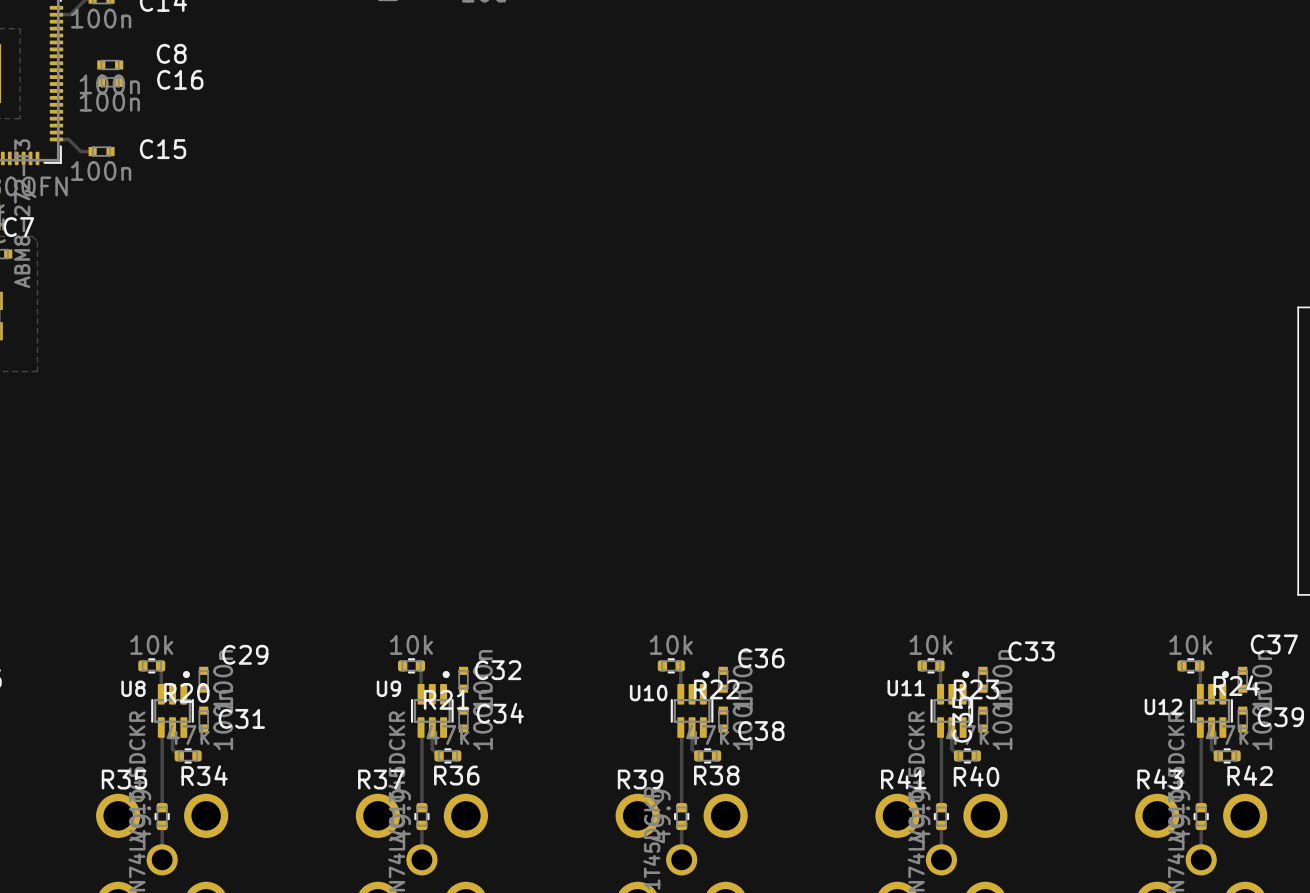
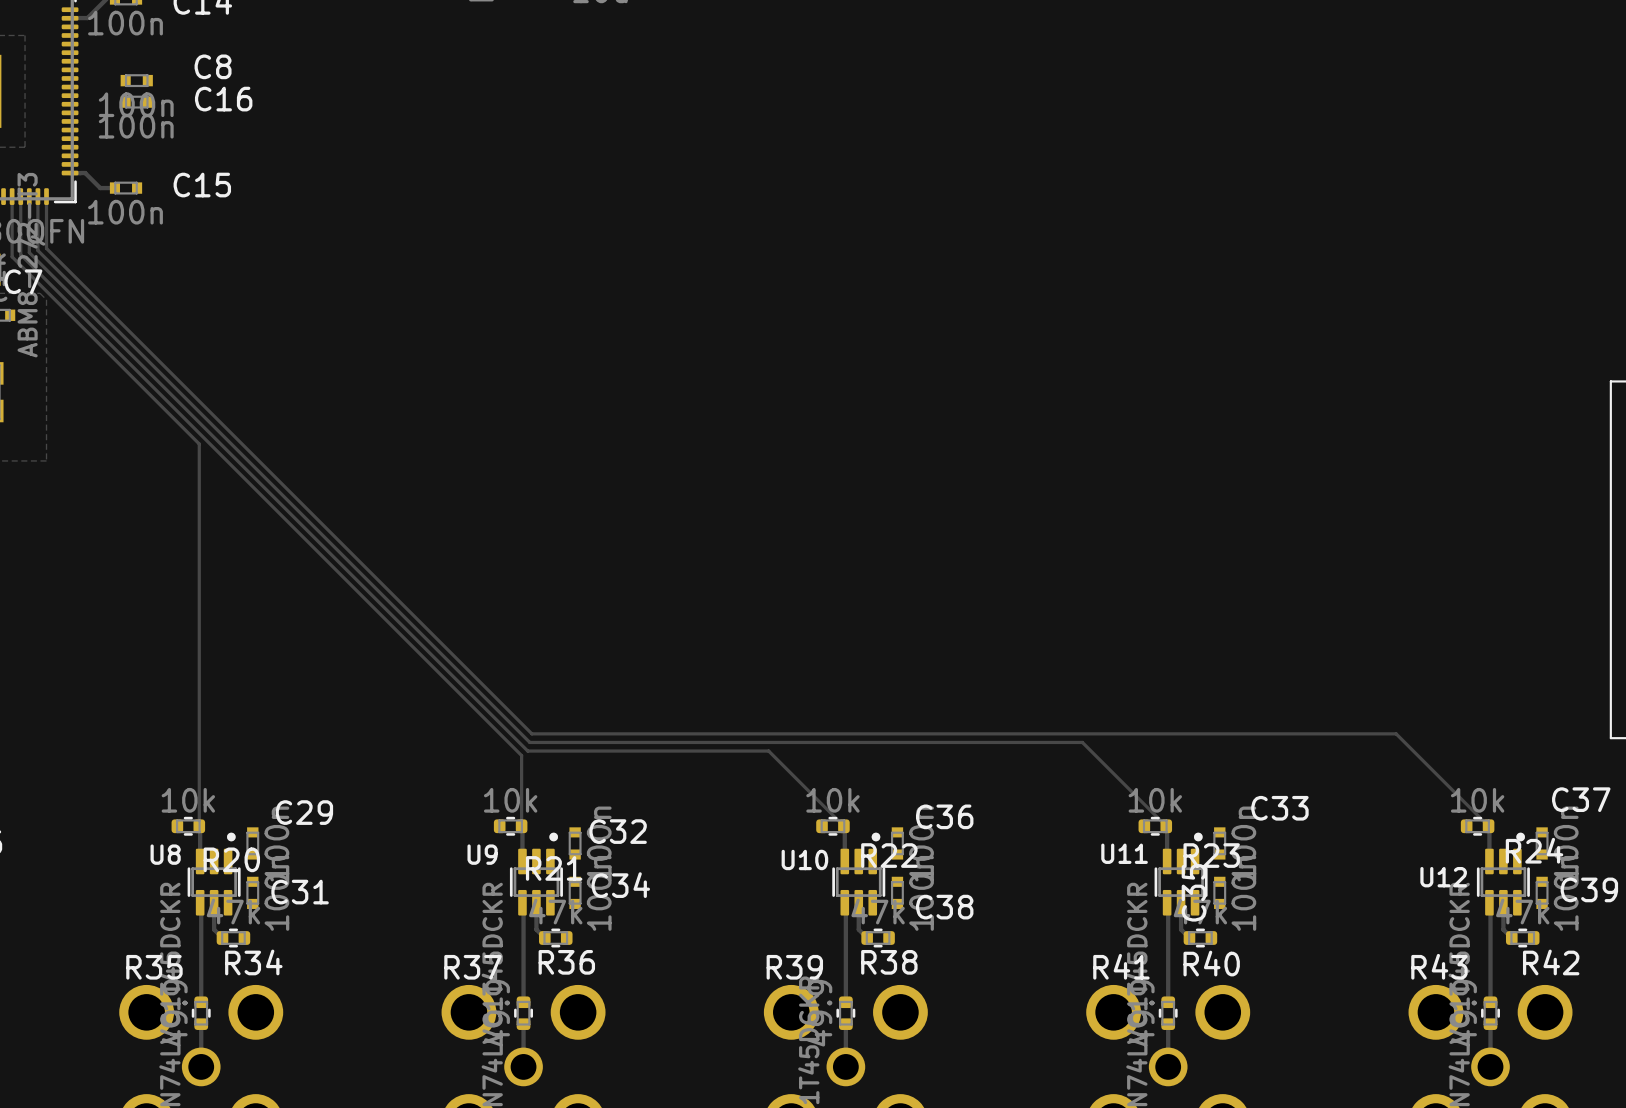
track: none -> (12, 196) (12, 256) (199, 443) (200, 827)
track: none -> (20, 196) (20, 254) (521, 755) (522, 827)
track: none -> (29, 196) (29, 252) (527, 751) (768, 751) (844, 827)
track: none -> (37, 196) (37, 250) (529, 742) (1082, 742) (1167, 827)
track: none -> (46, 196) (46, 248) (531, 733) (1396, 733) (1489, 827)

